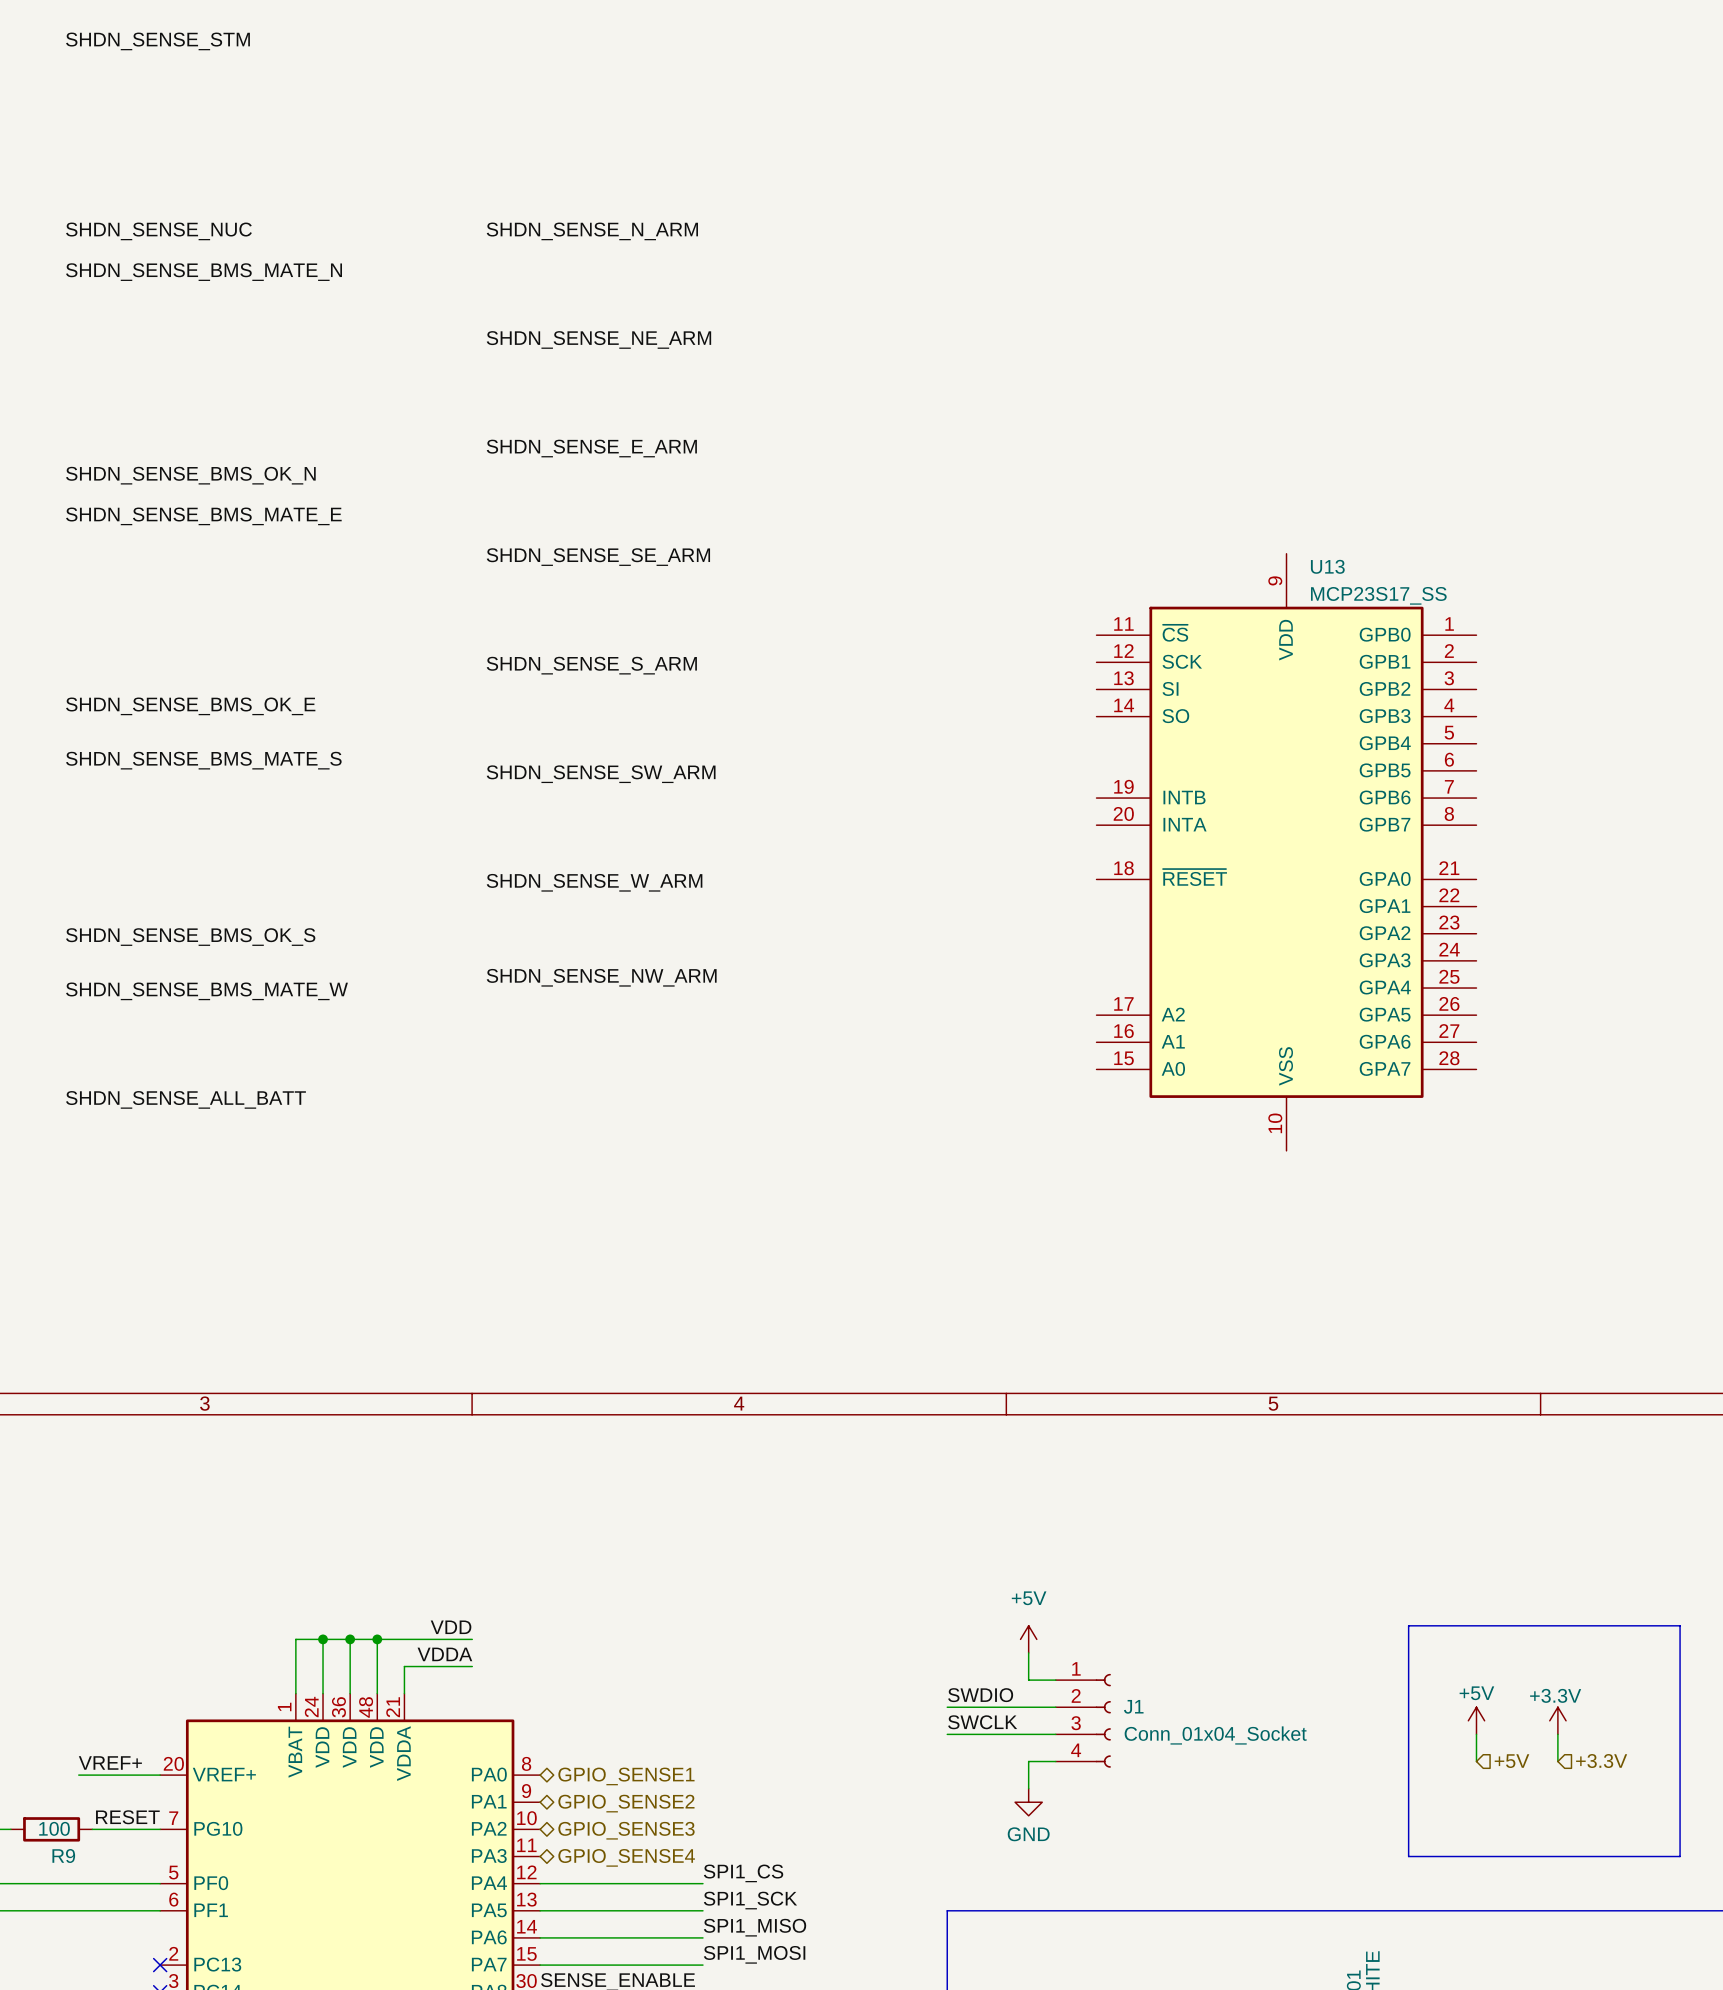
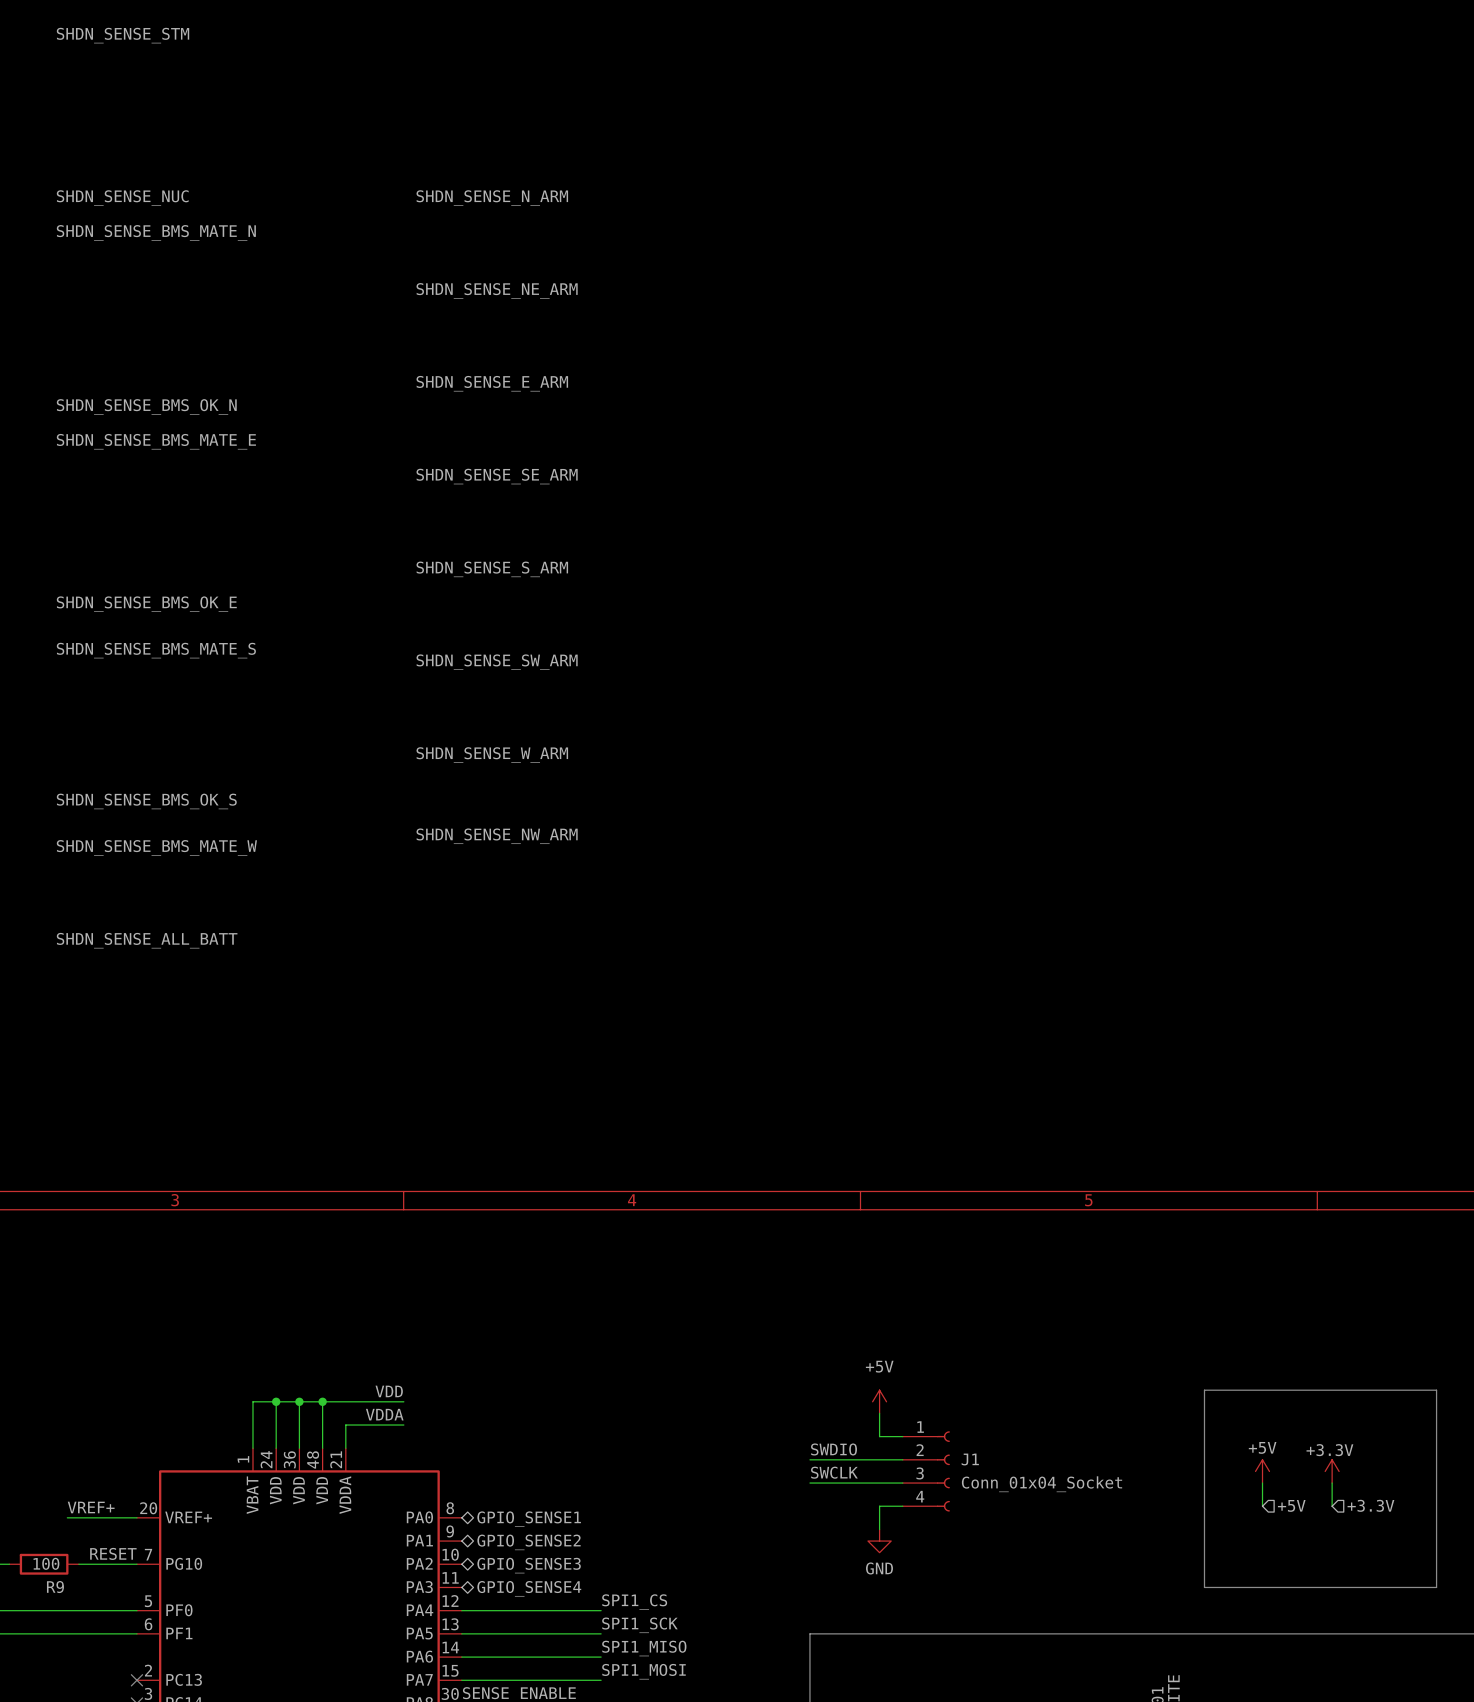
U13: MCP23S17_SS (1286, 852) -> none

